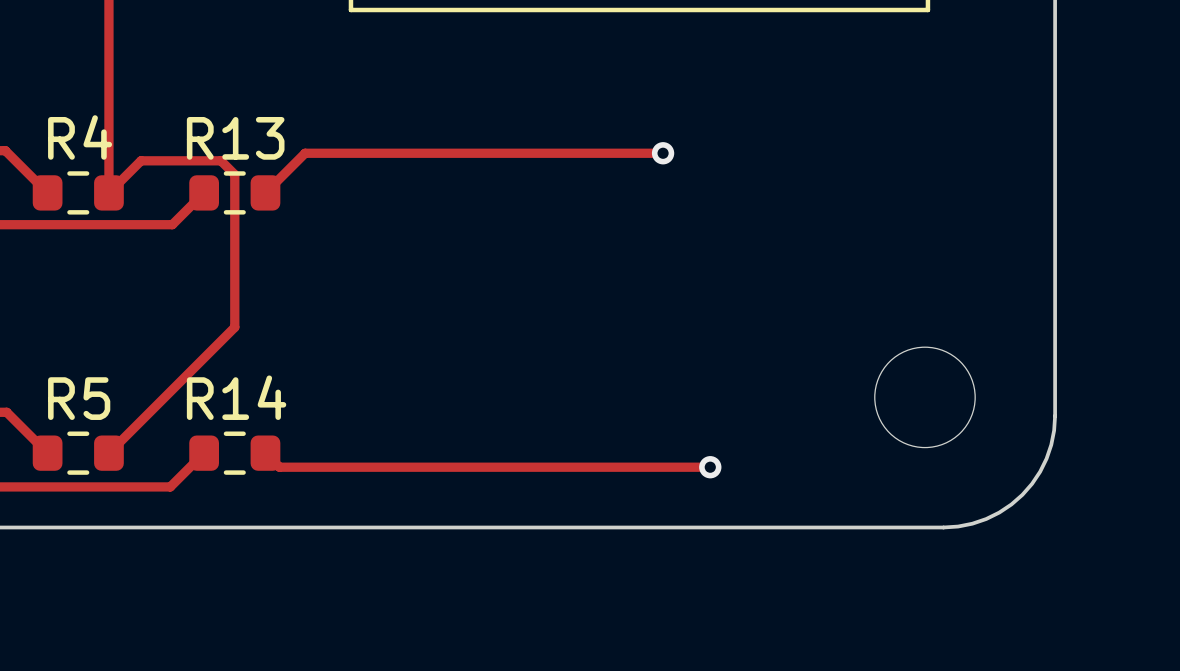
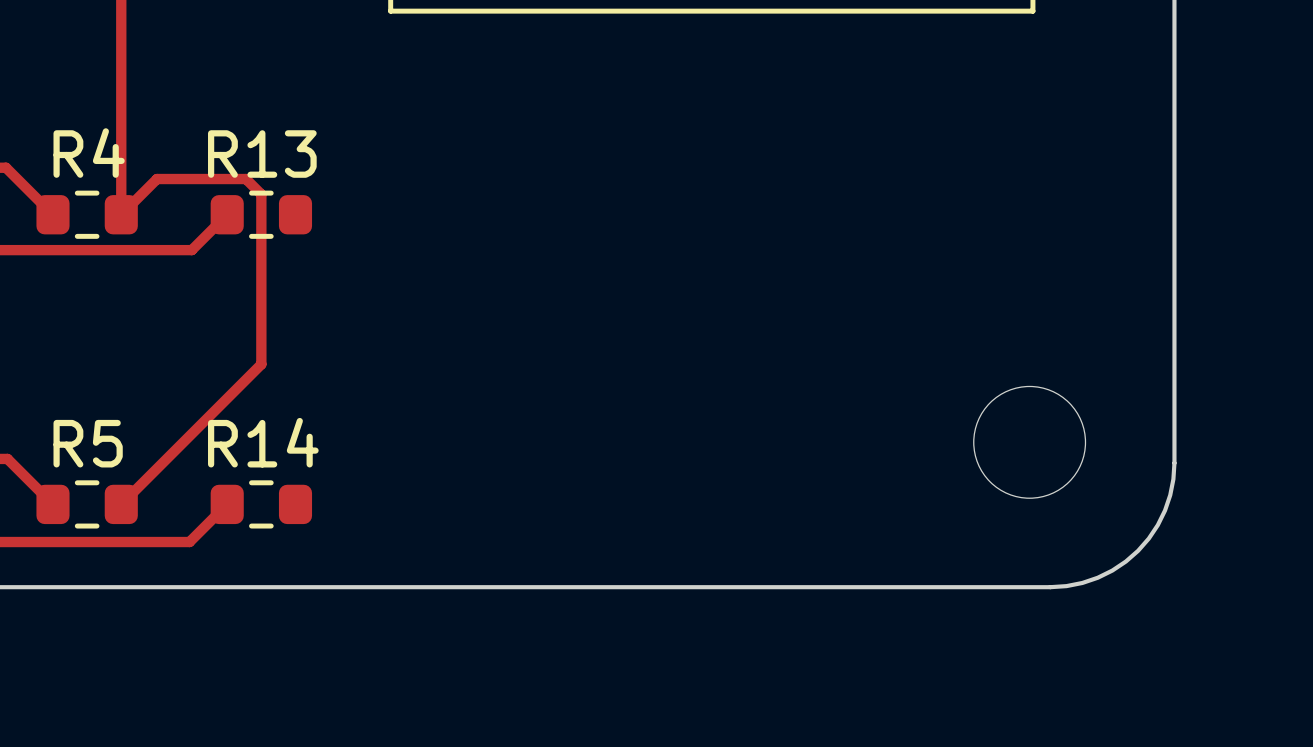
track: (663, 153) (305, 153) (265, 192) -> none
via: (663, 153) -> none
track: (265, 453) (279, 467) (710, 467) -> none
via: (710, 467) -> none

